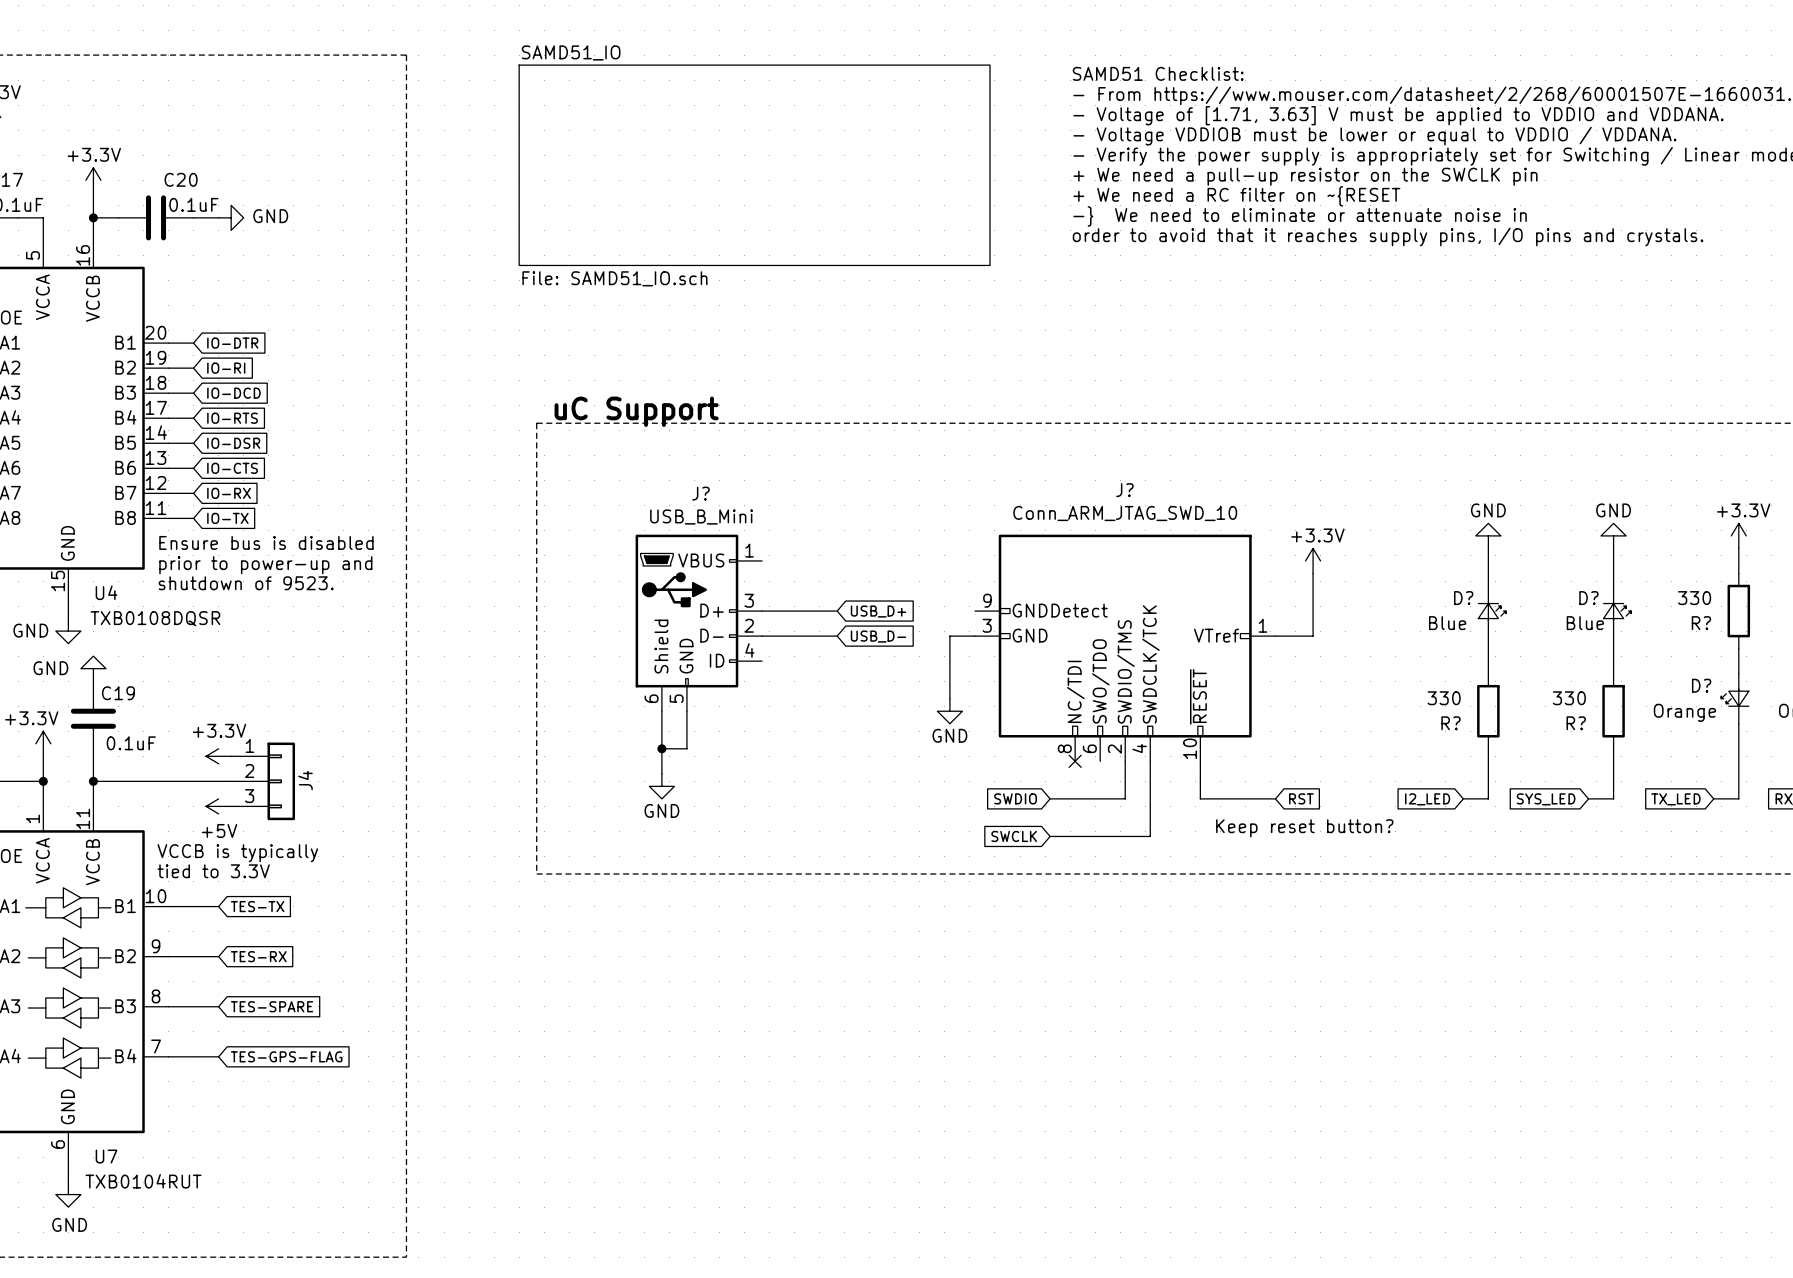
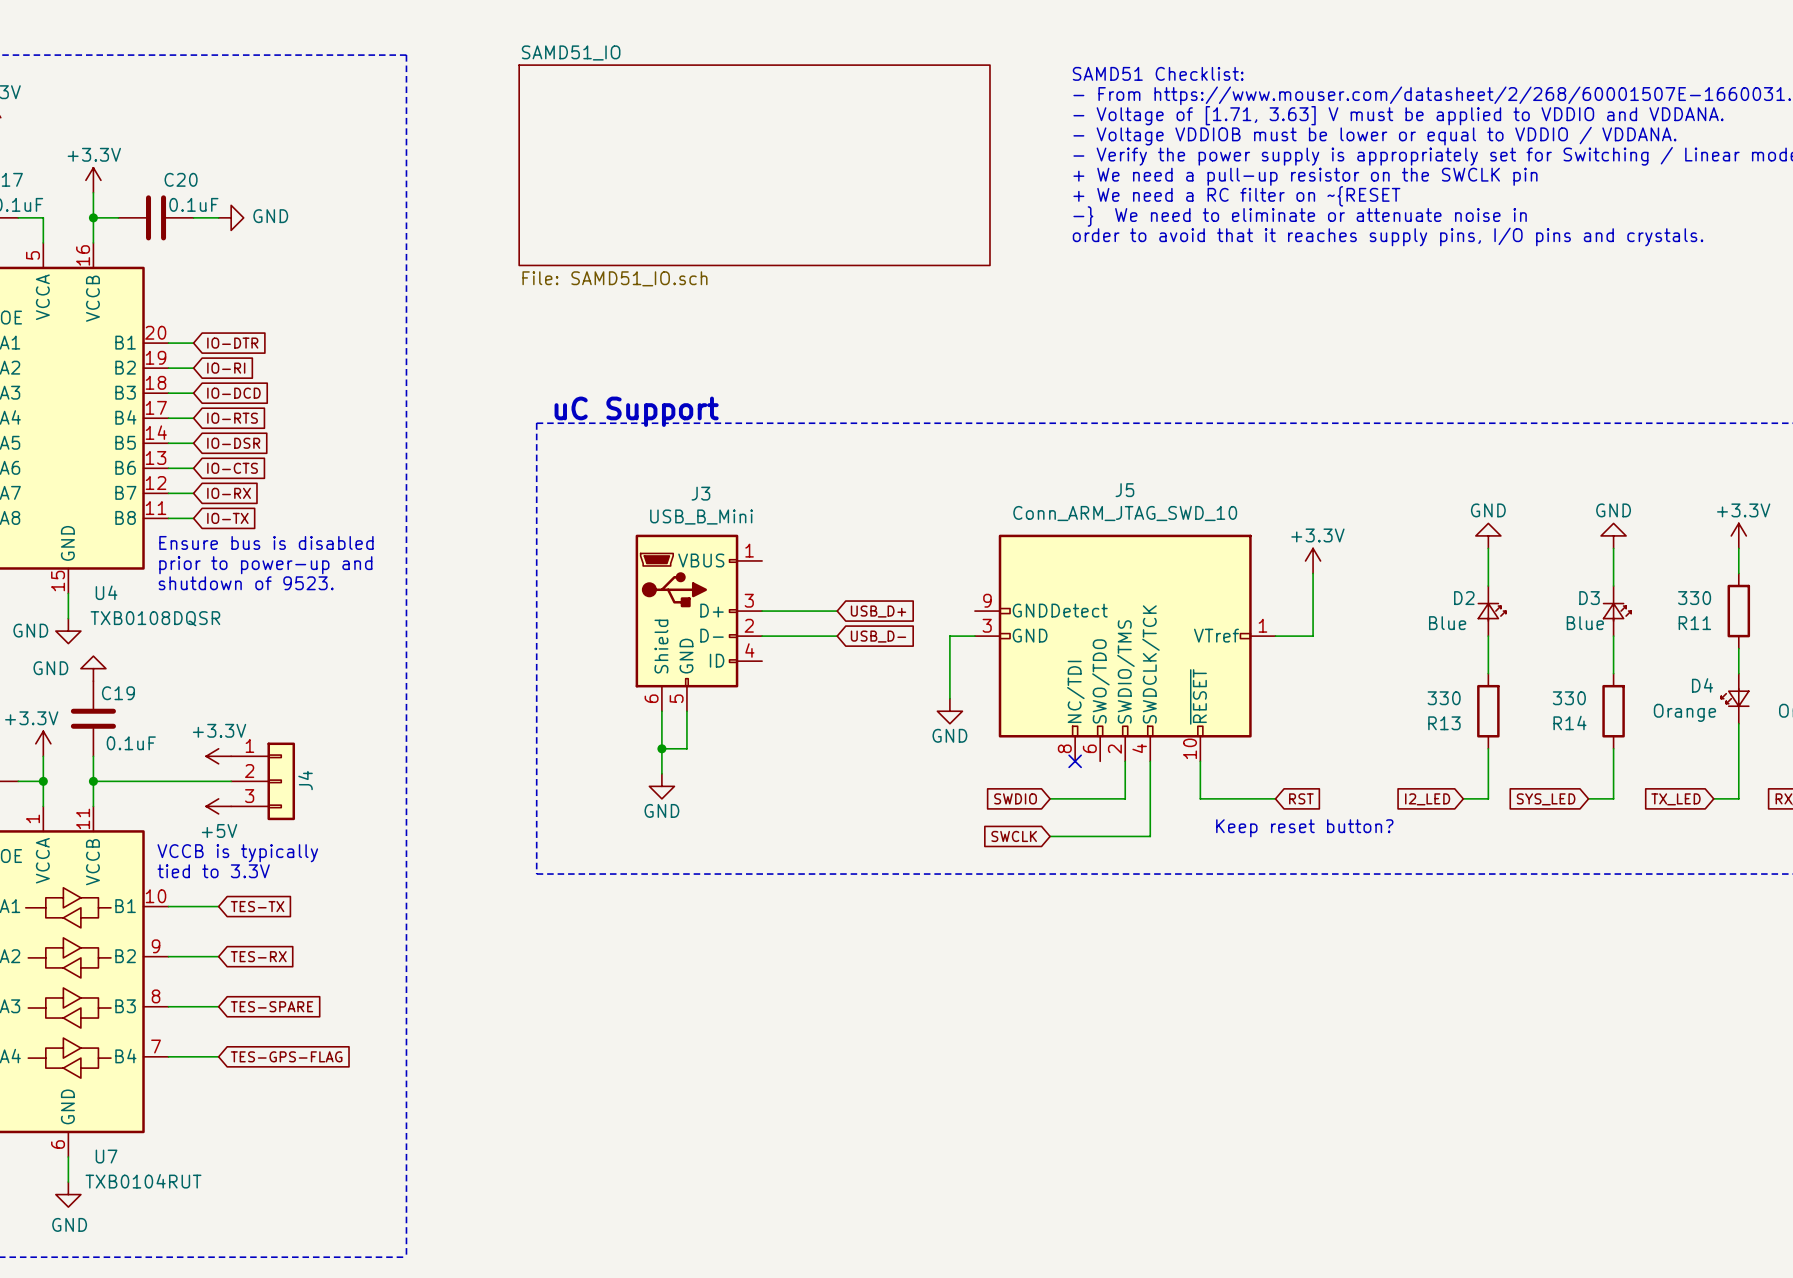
J? name: J? (1124, 490) -> J5 (1124, 490)
J? name: J? (700, 493) -> J3 (700, 493)
D? name: D? (1463, 598) -> D2 (1464, 598)
D? name: D? (1588, 598) -> D3 (1589, 598)
R? name: R? (1701, 623) -> R11 (1694, 623)
D? name: D? (1701, 685) -> D4 (1702, 685)
R? name: R? (1451, 723) -> R13 (1444, 723)
R? name: R? (1576, 723) -> R14 (1569, 722)

